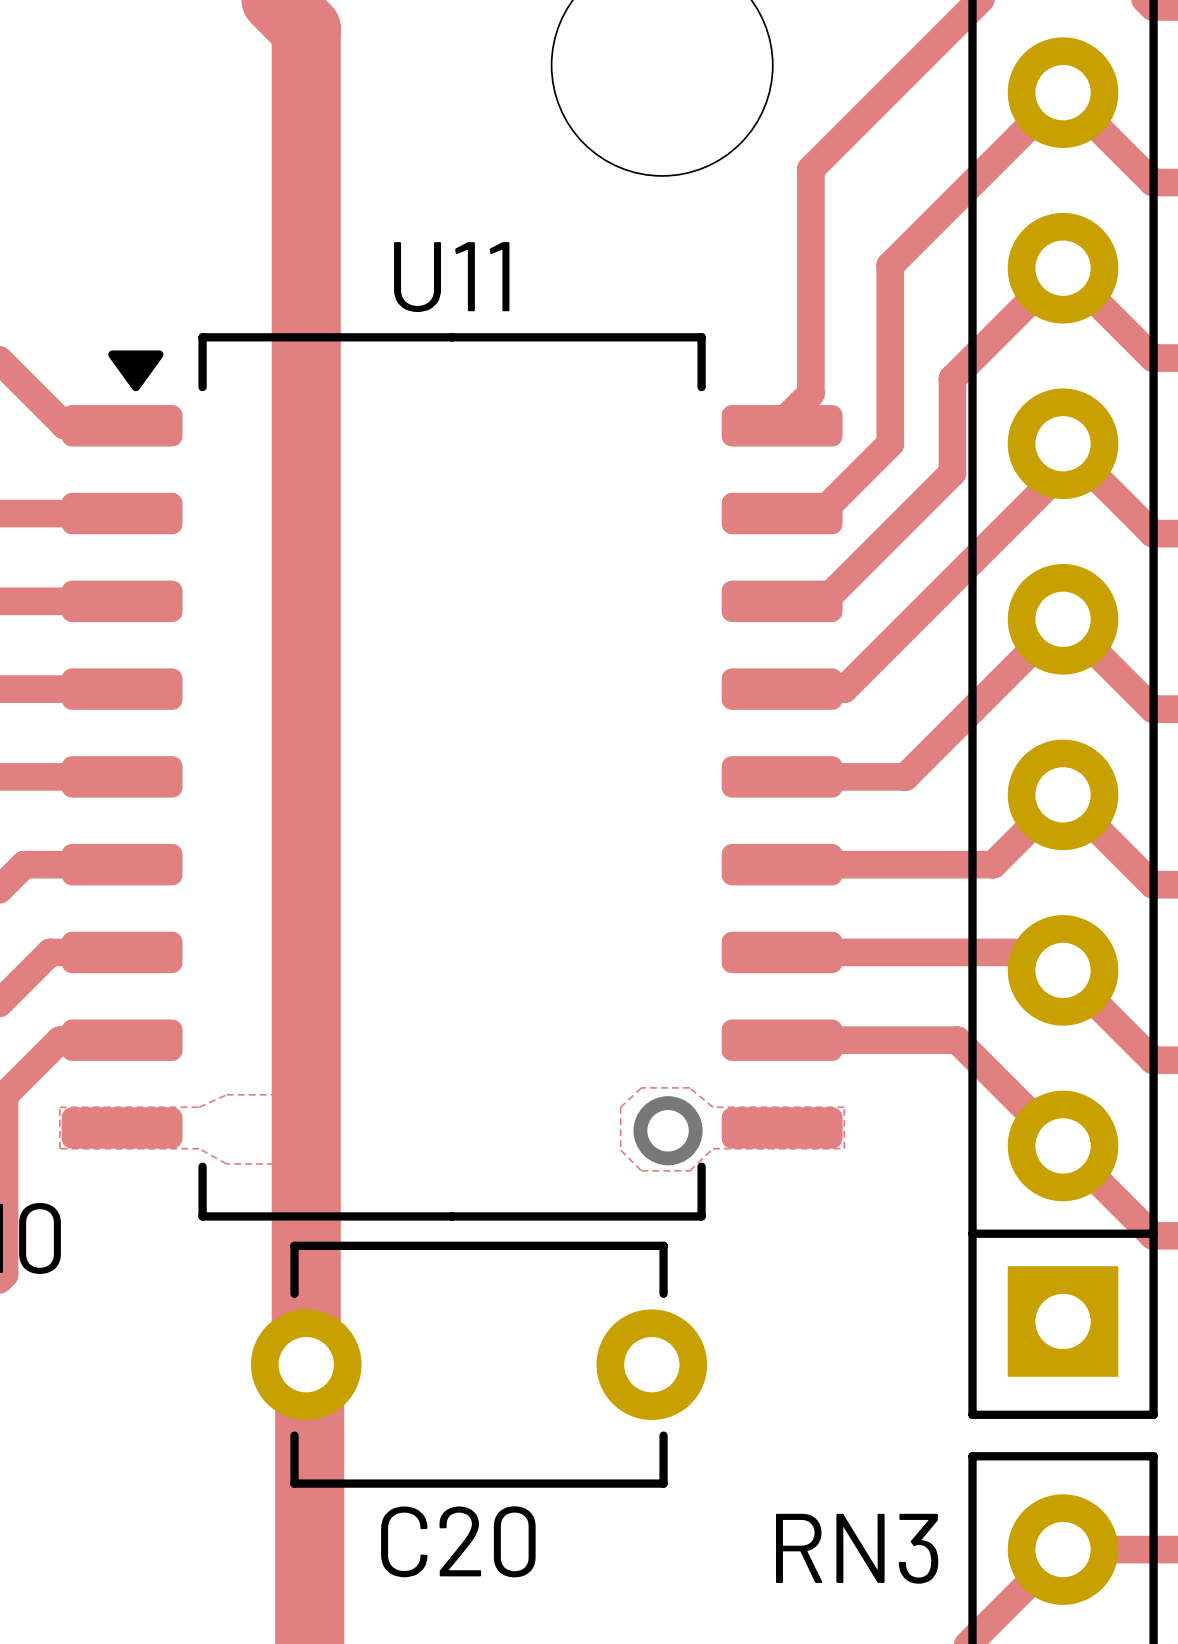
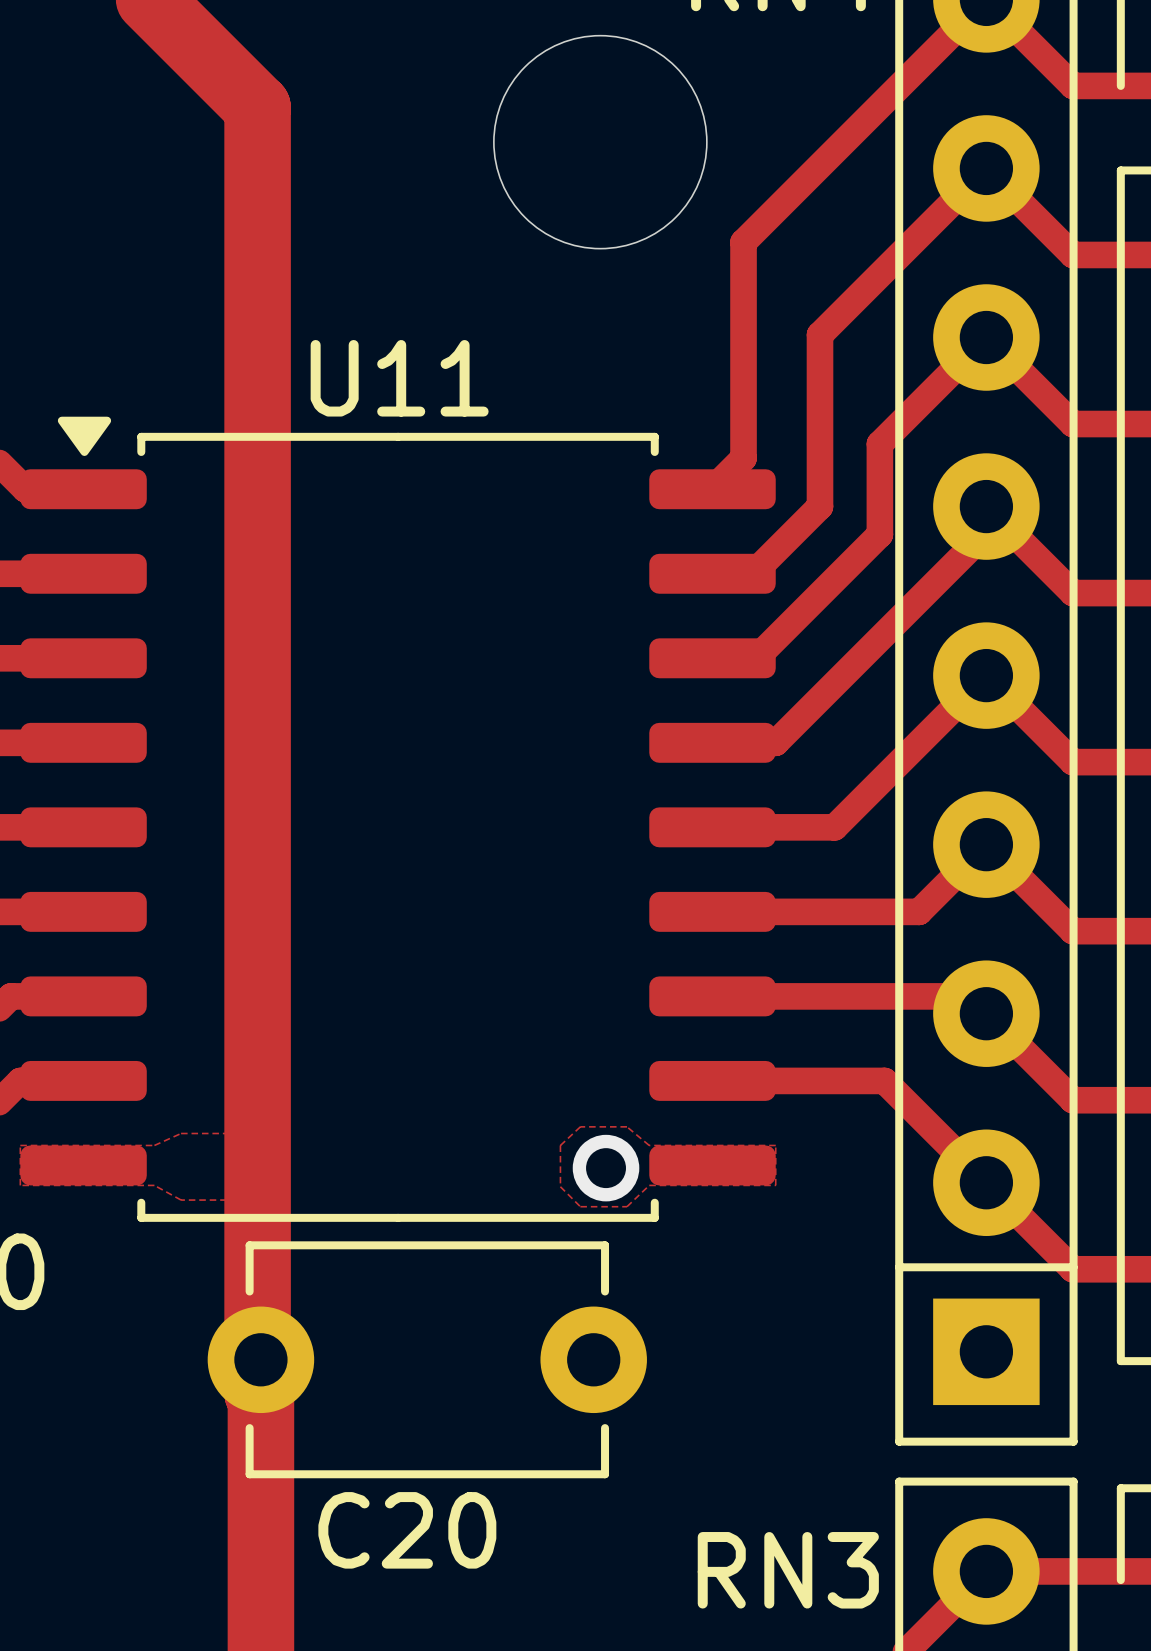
U11 name position: U11 (451, 277) -> U11 (399, 378)
U11 footprint: [61, 333, 843, 1221] -> [20, 416, 776, 1222]
C20 position: (479, 1364) -> (427, 1359)

